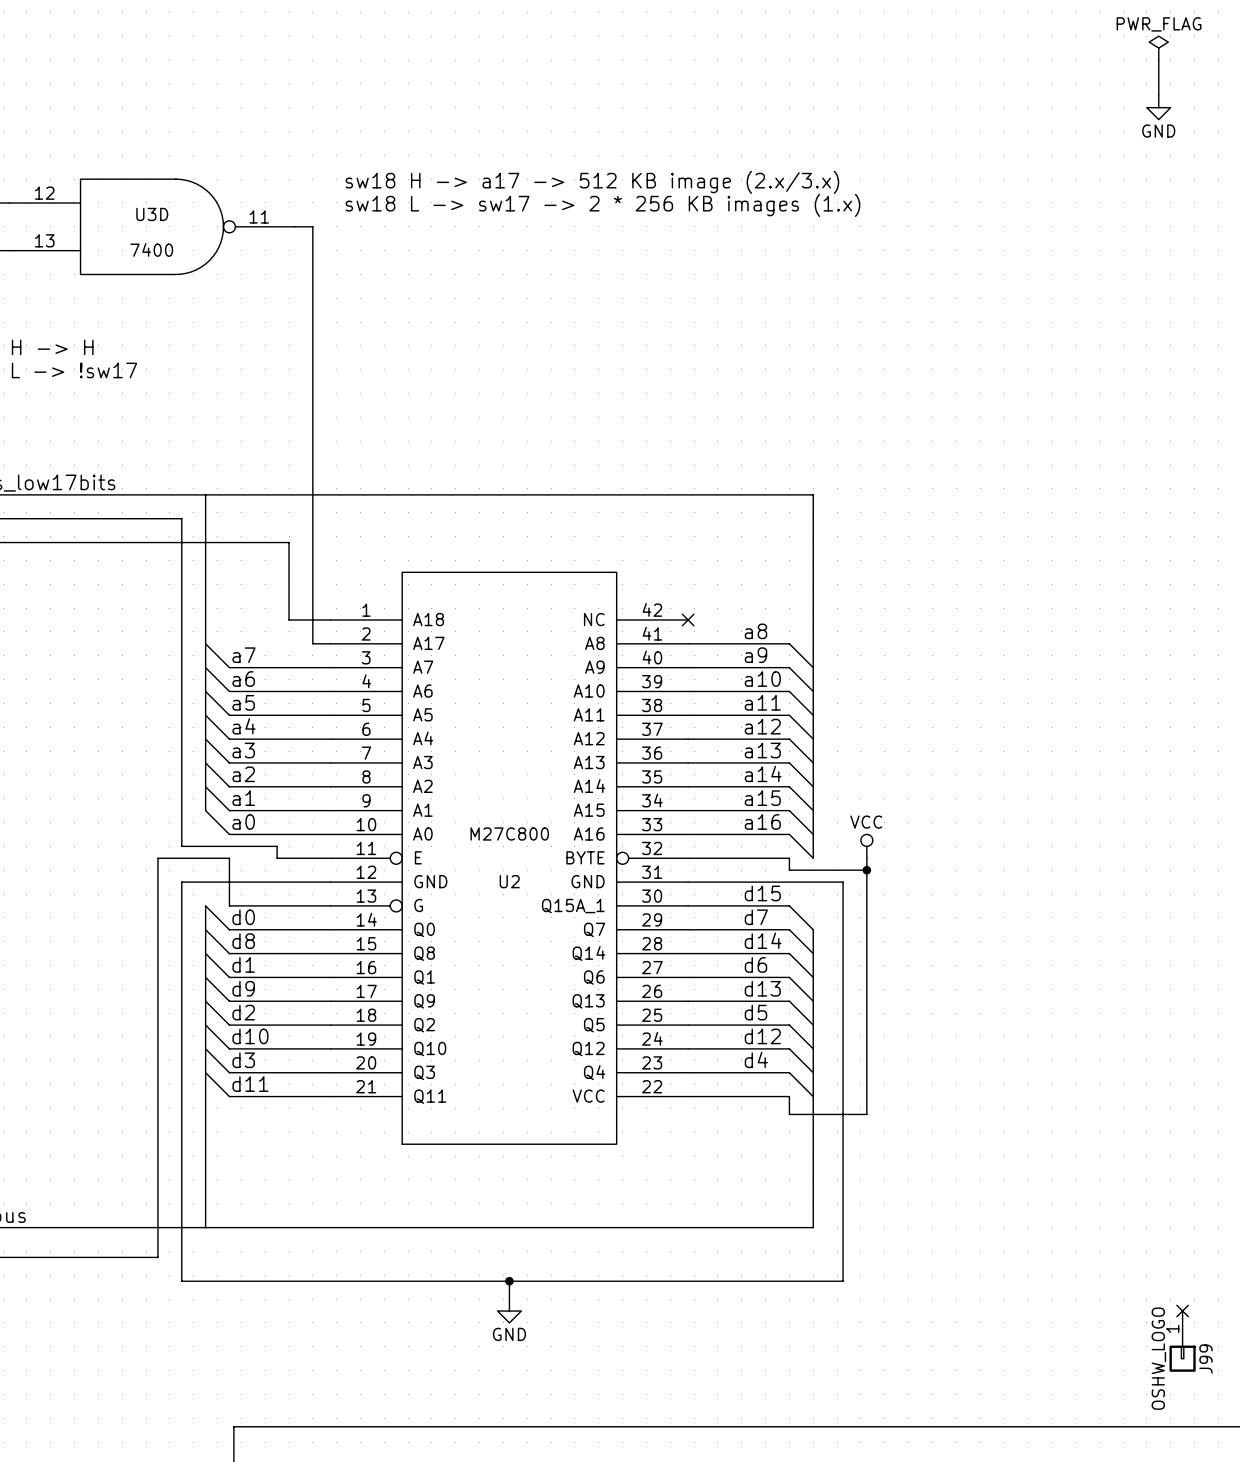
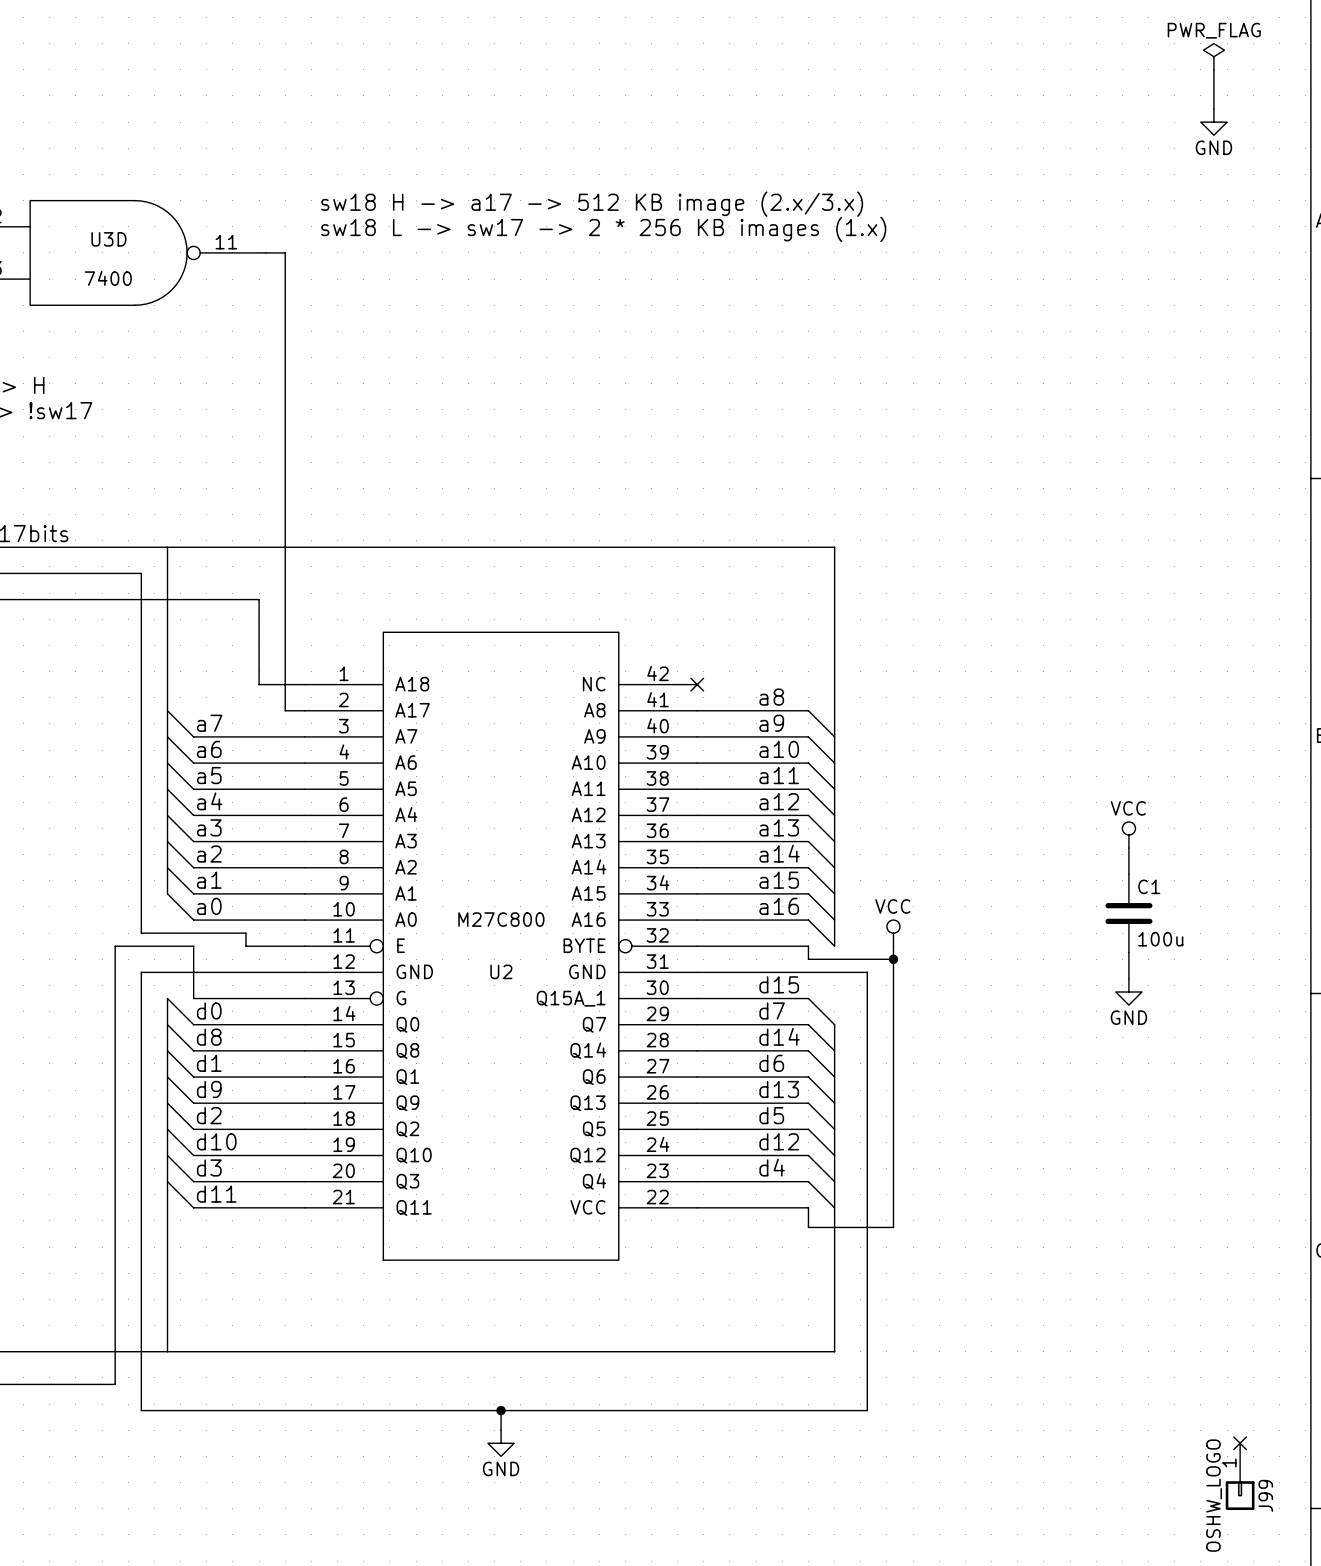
power symbol: none -> VCC (1128, 835)
wire: none -> (1128, 848) (1128, 874)
C1: none -> 100u (1128, 913)
wire: none -> (1128, 952) (1128, 978)
power symbol: none -> GND (1128, 992)

